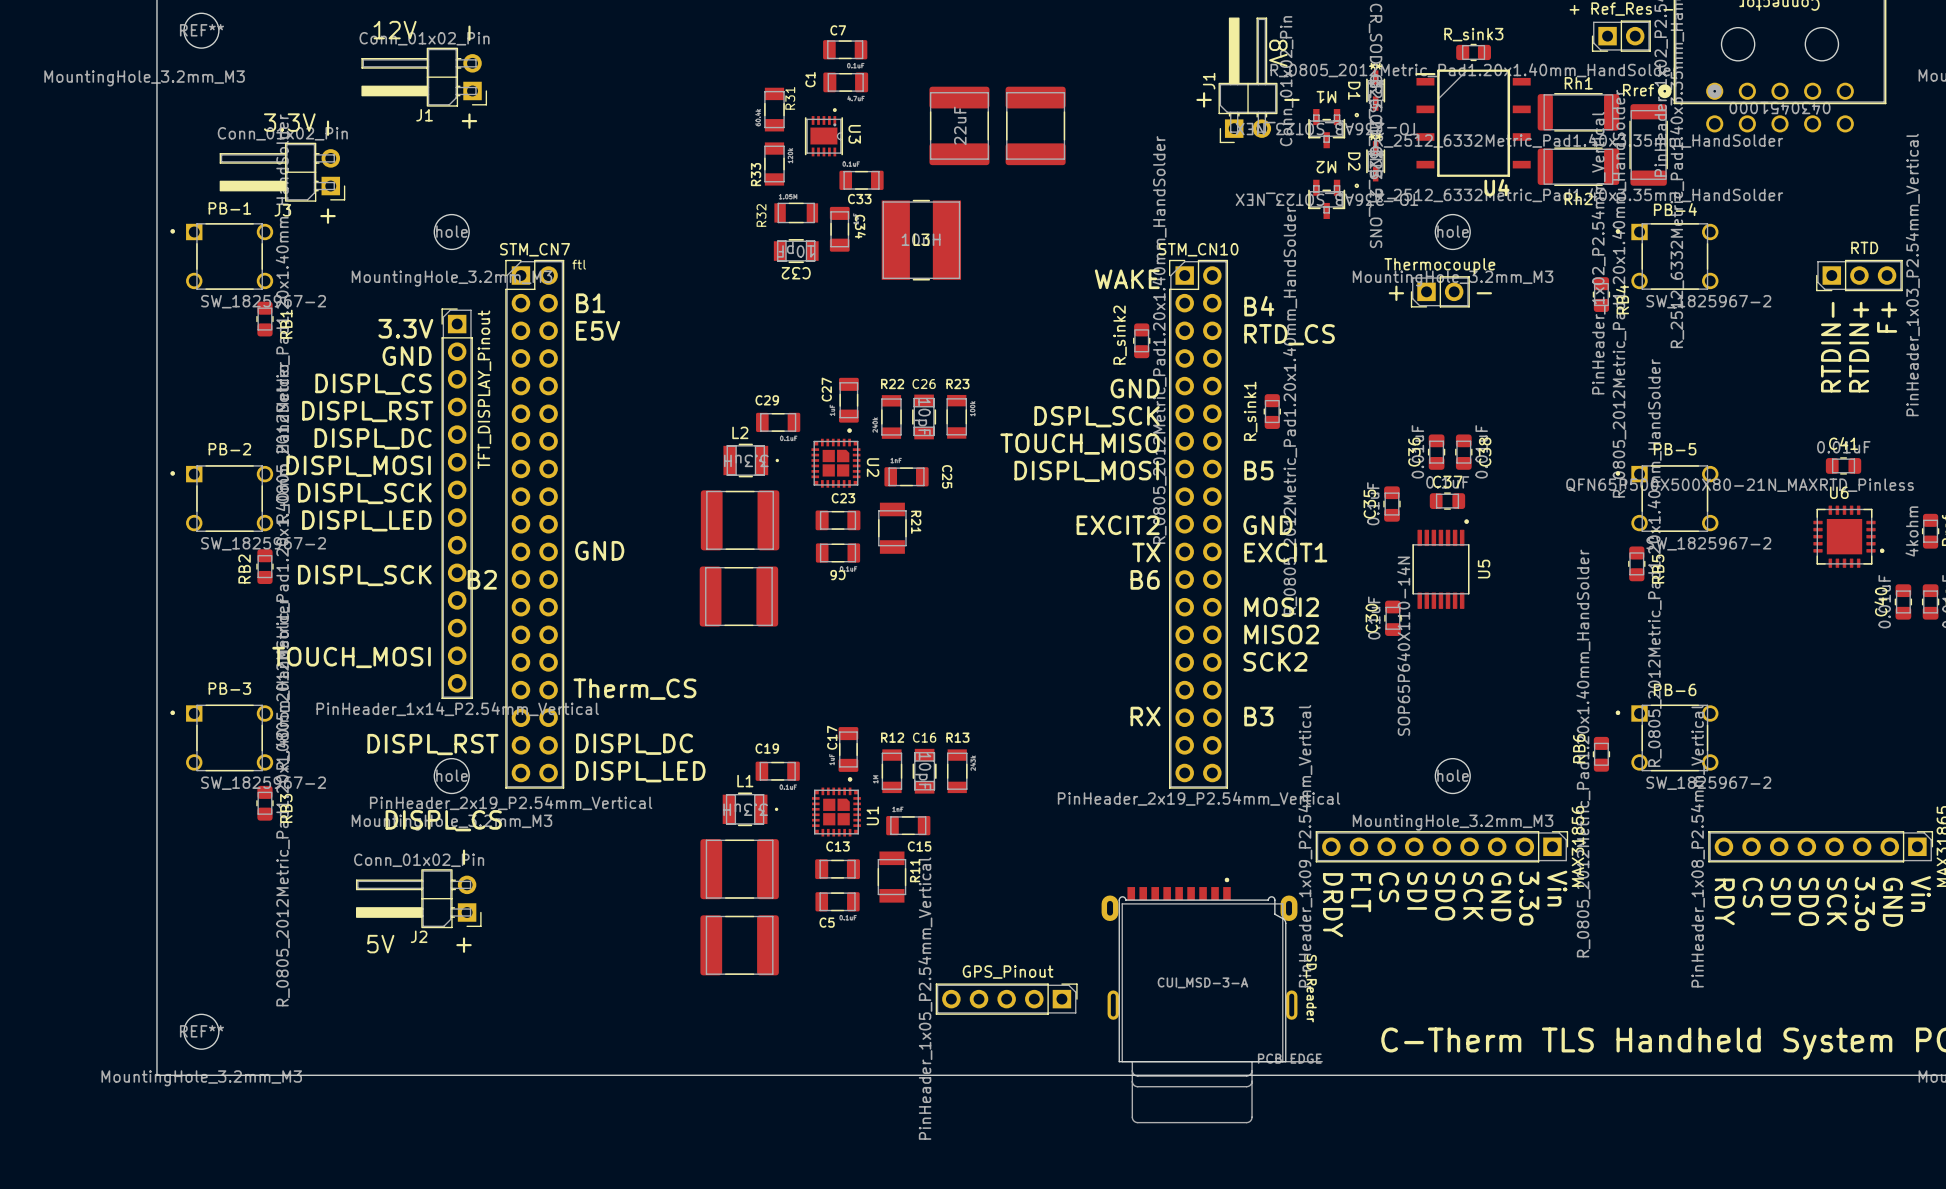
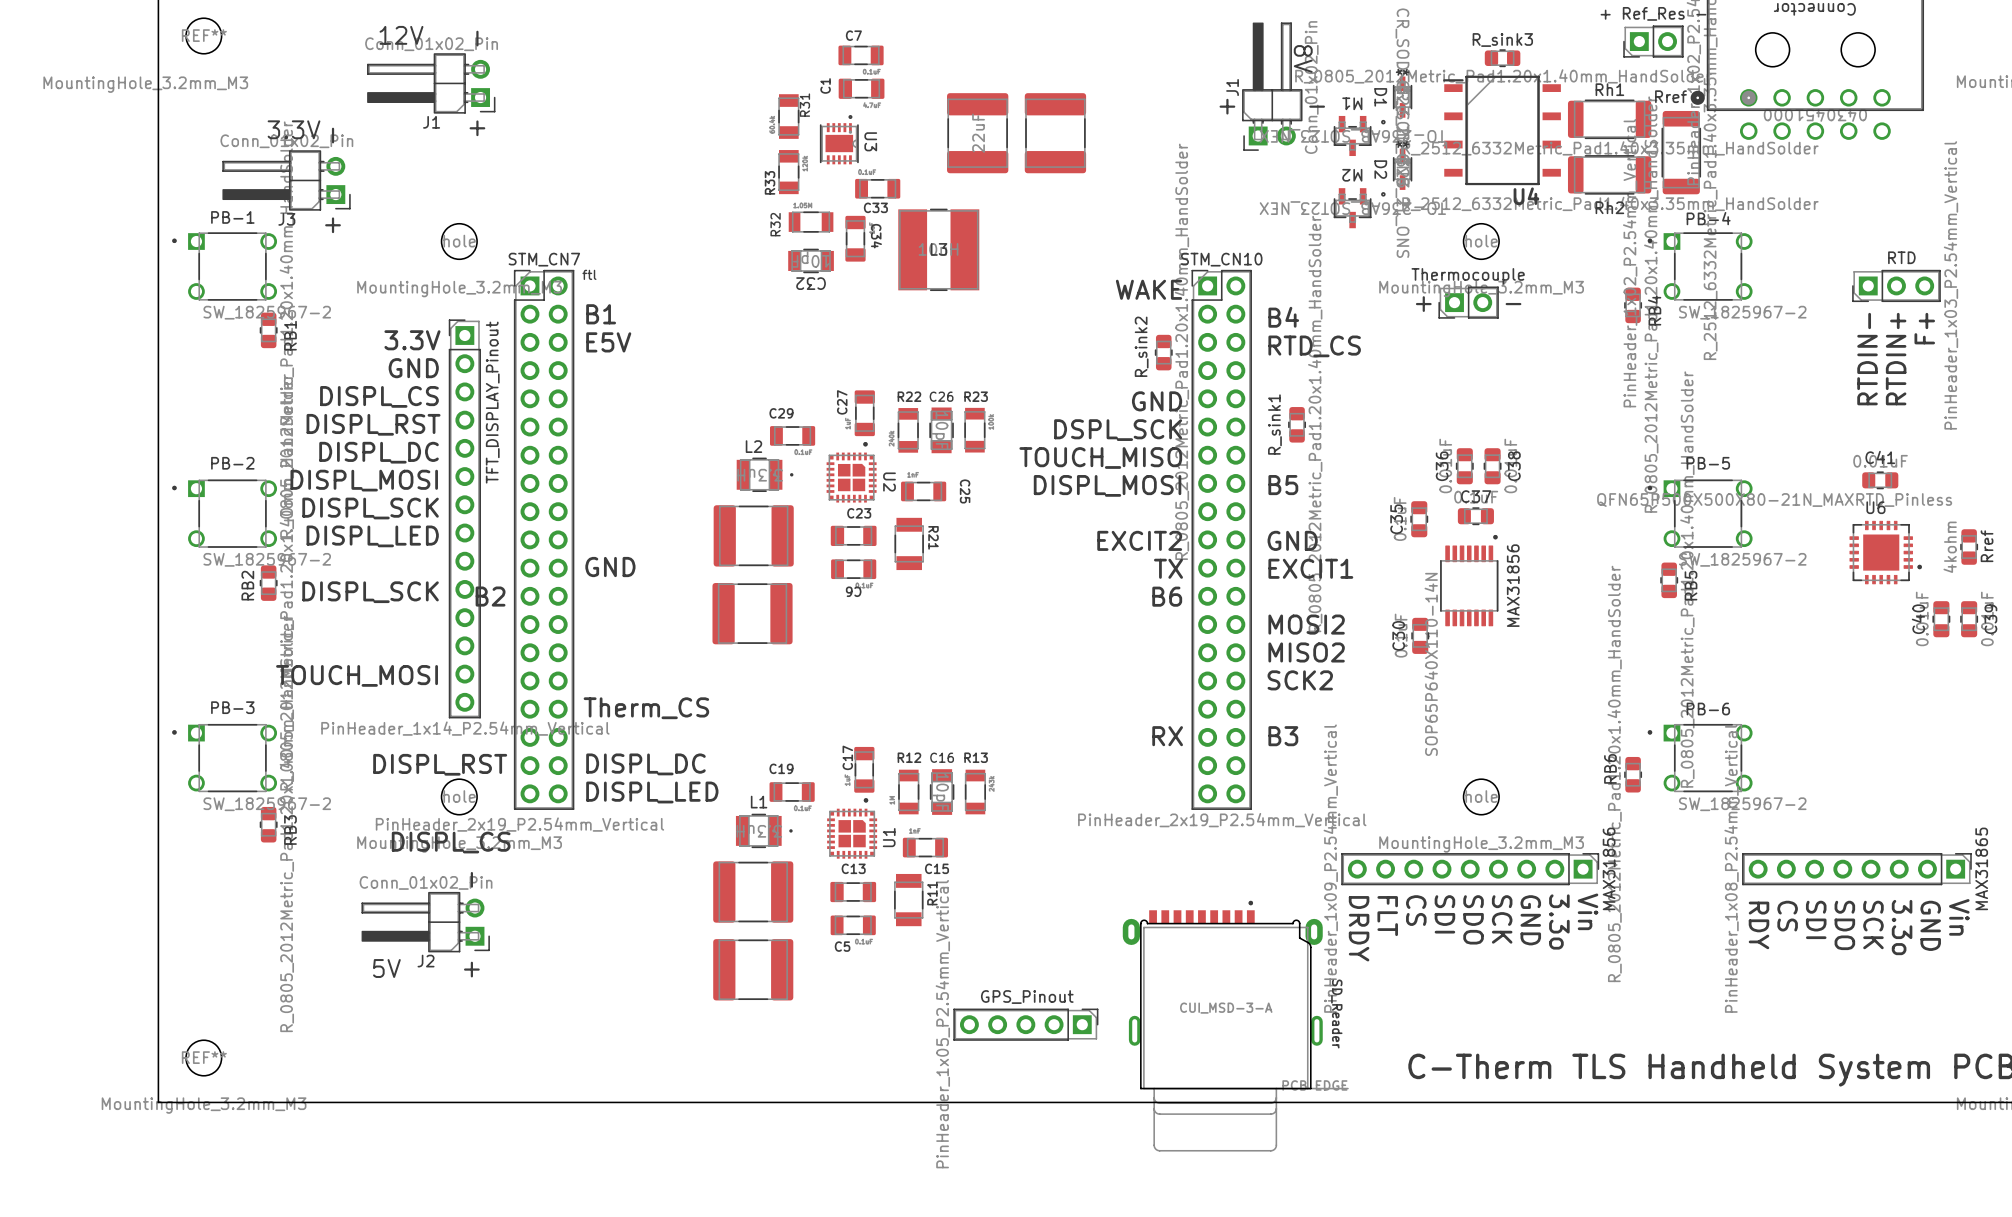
U5 name: U5 (1484, 569) -> MAX31856 (1513, 585)

